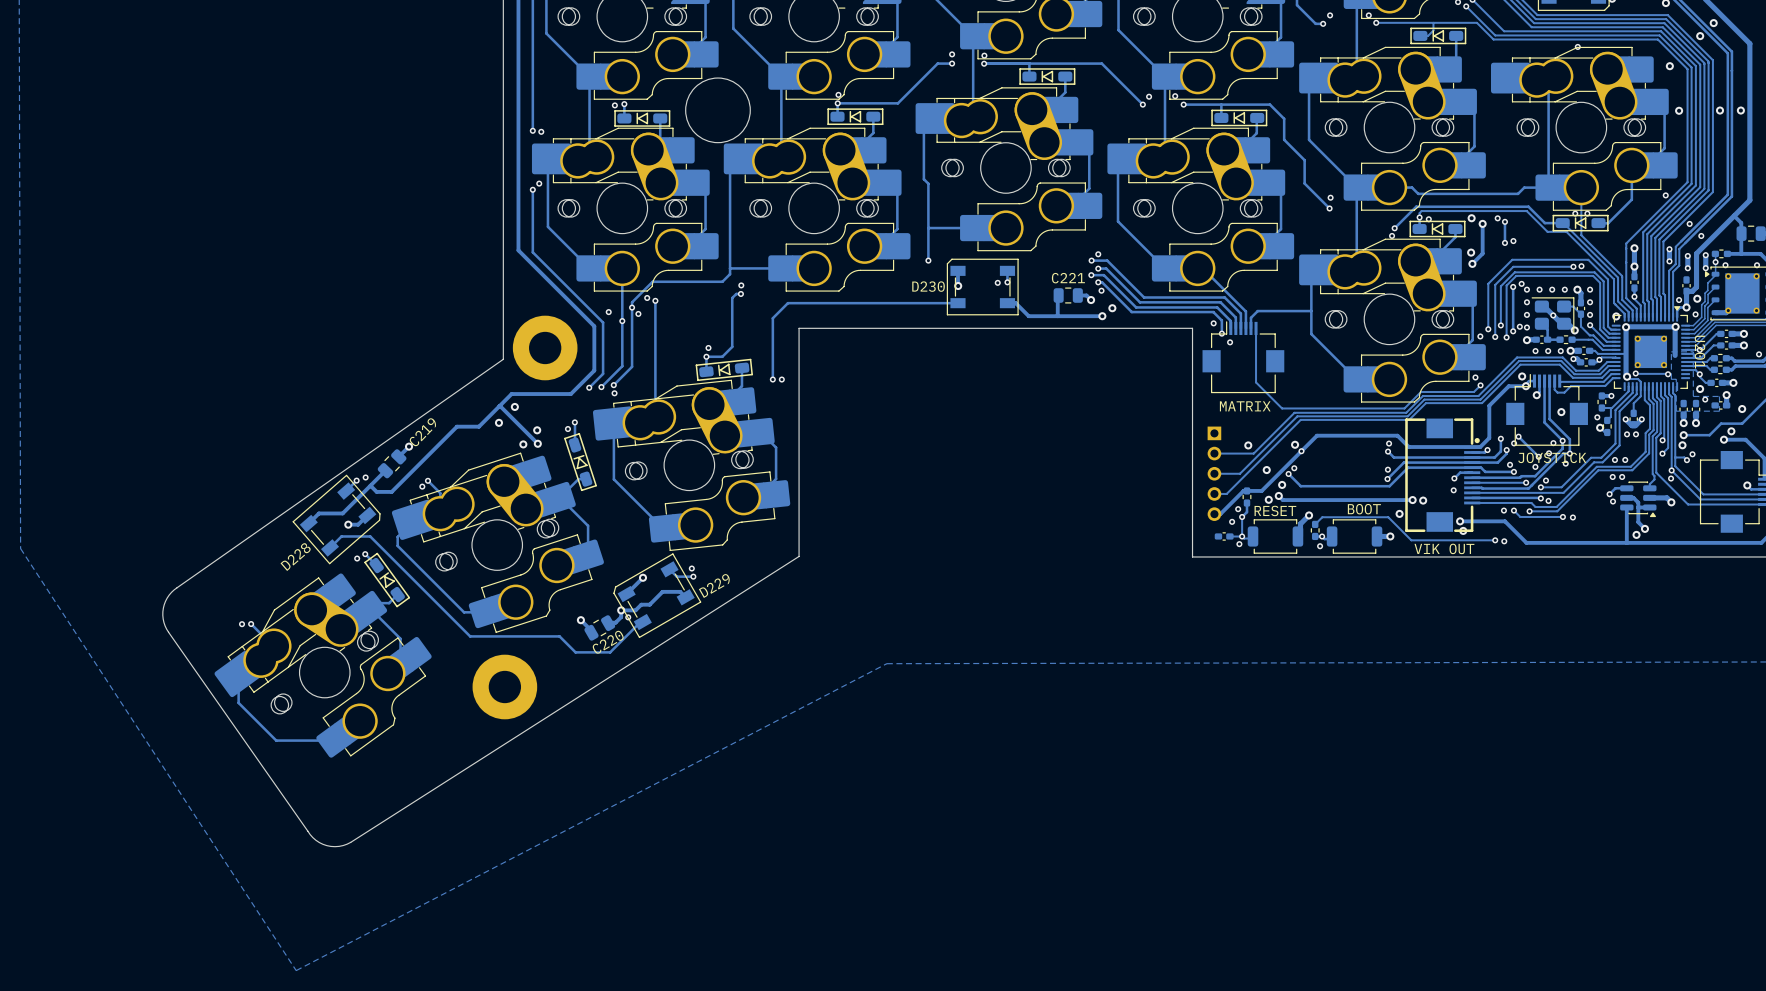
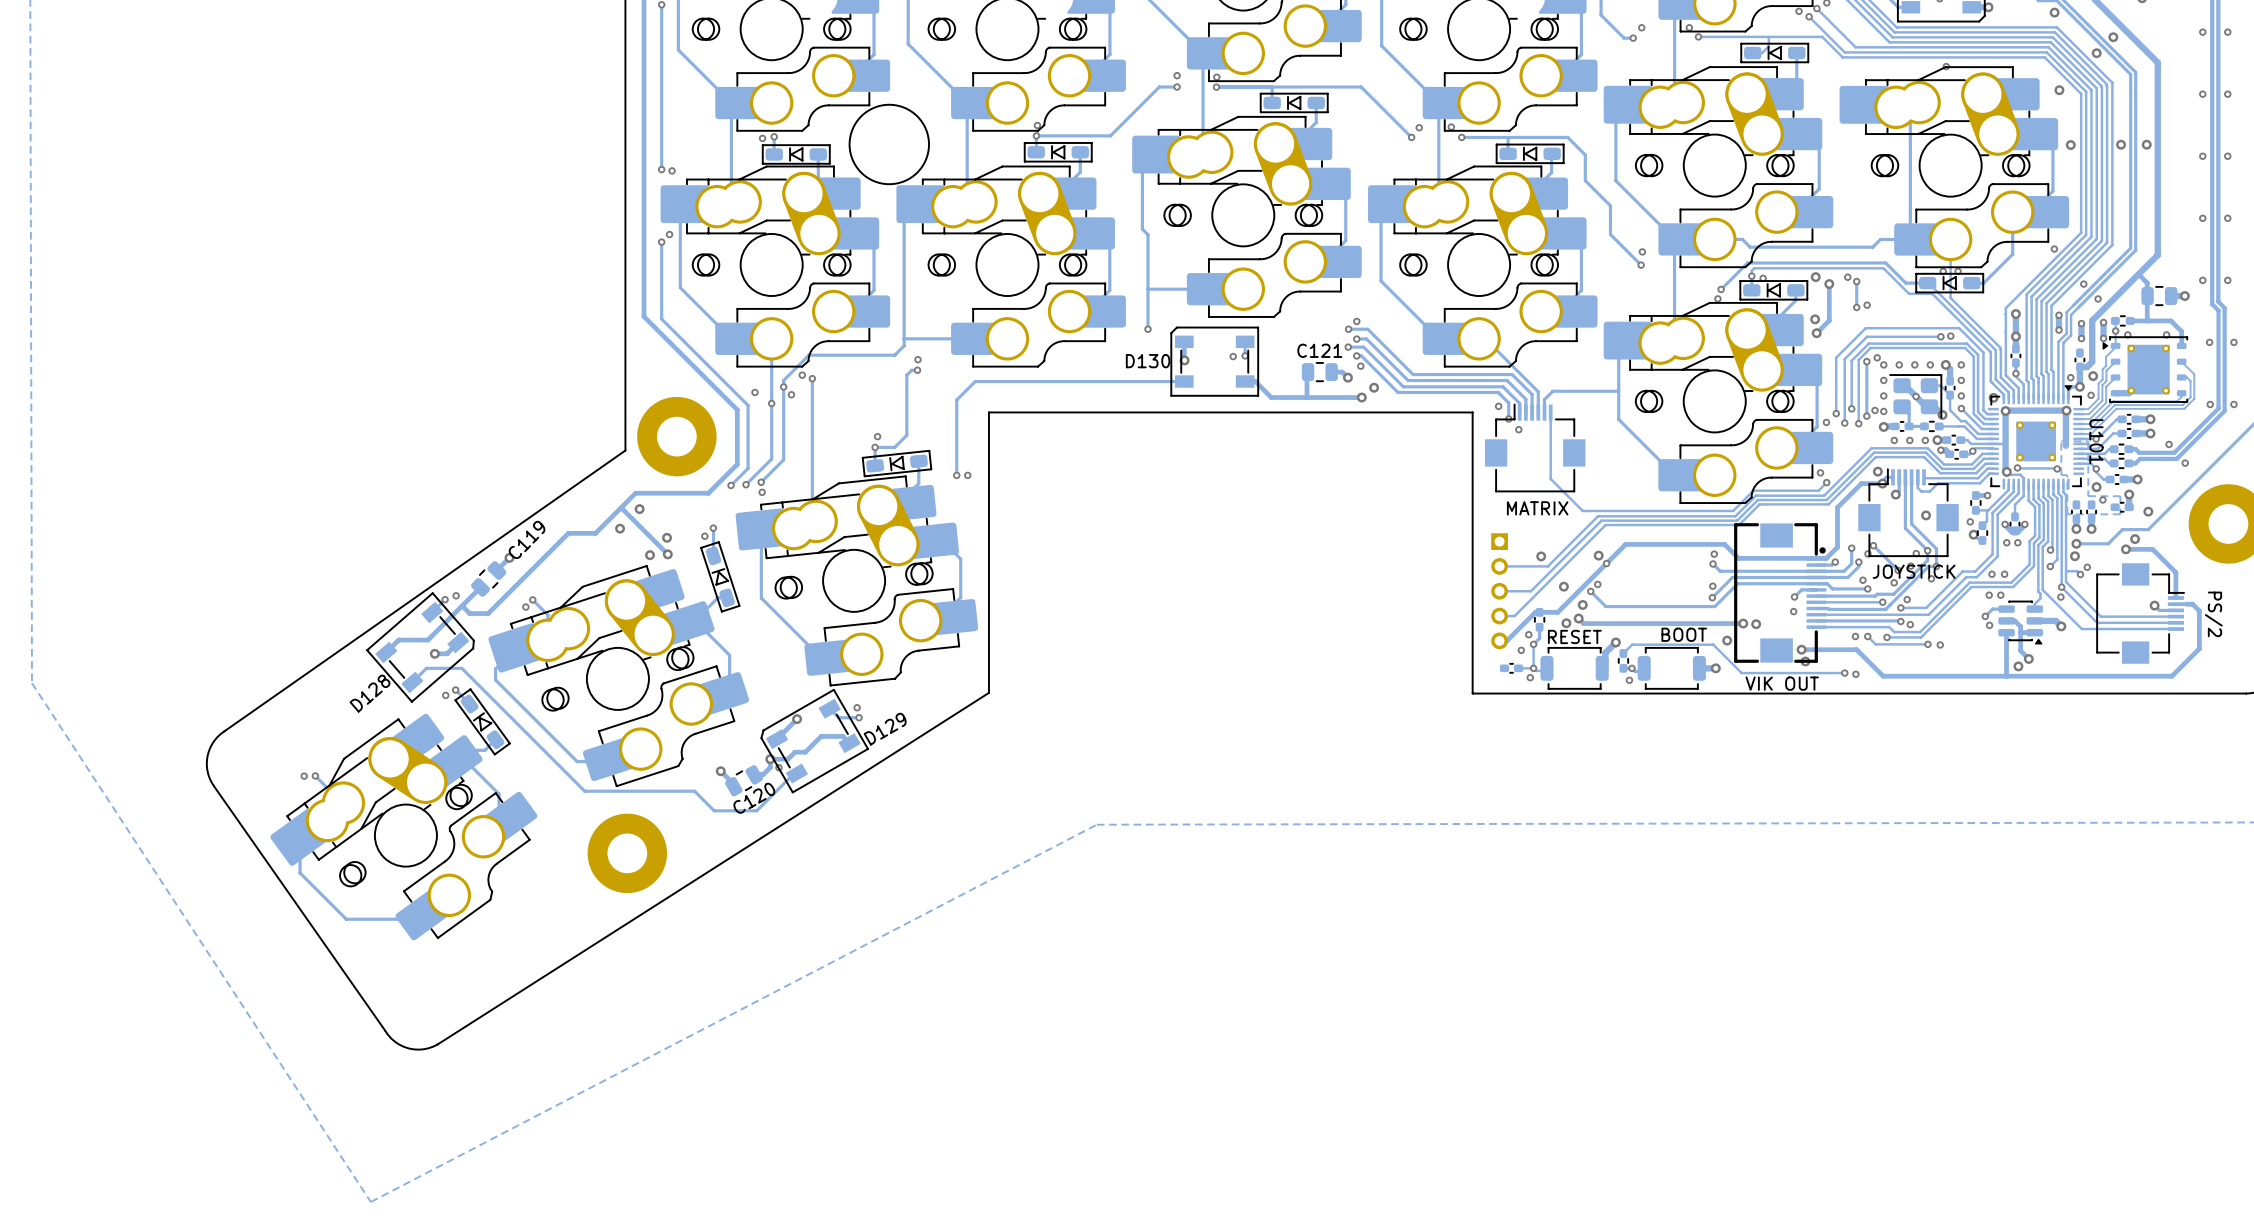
C221 name: C221 (1068, 278) -> C121 (1319, 350)
D230 name: D230 (928, 286) -> D130 (1148, 361)
U201 name: U201 (1700, 352) -> U101 (2096, 441)
C219 name: C219 (422, 432) -> C119 (527, 539)
D228 name: D228 (295, 557) -> D128 (370, 693)
D229 name: D229 (714, 586) -> D129 (885, 729)
C220 name: C220 (608, 642) -> C120 (754, 798)

